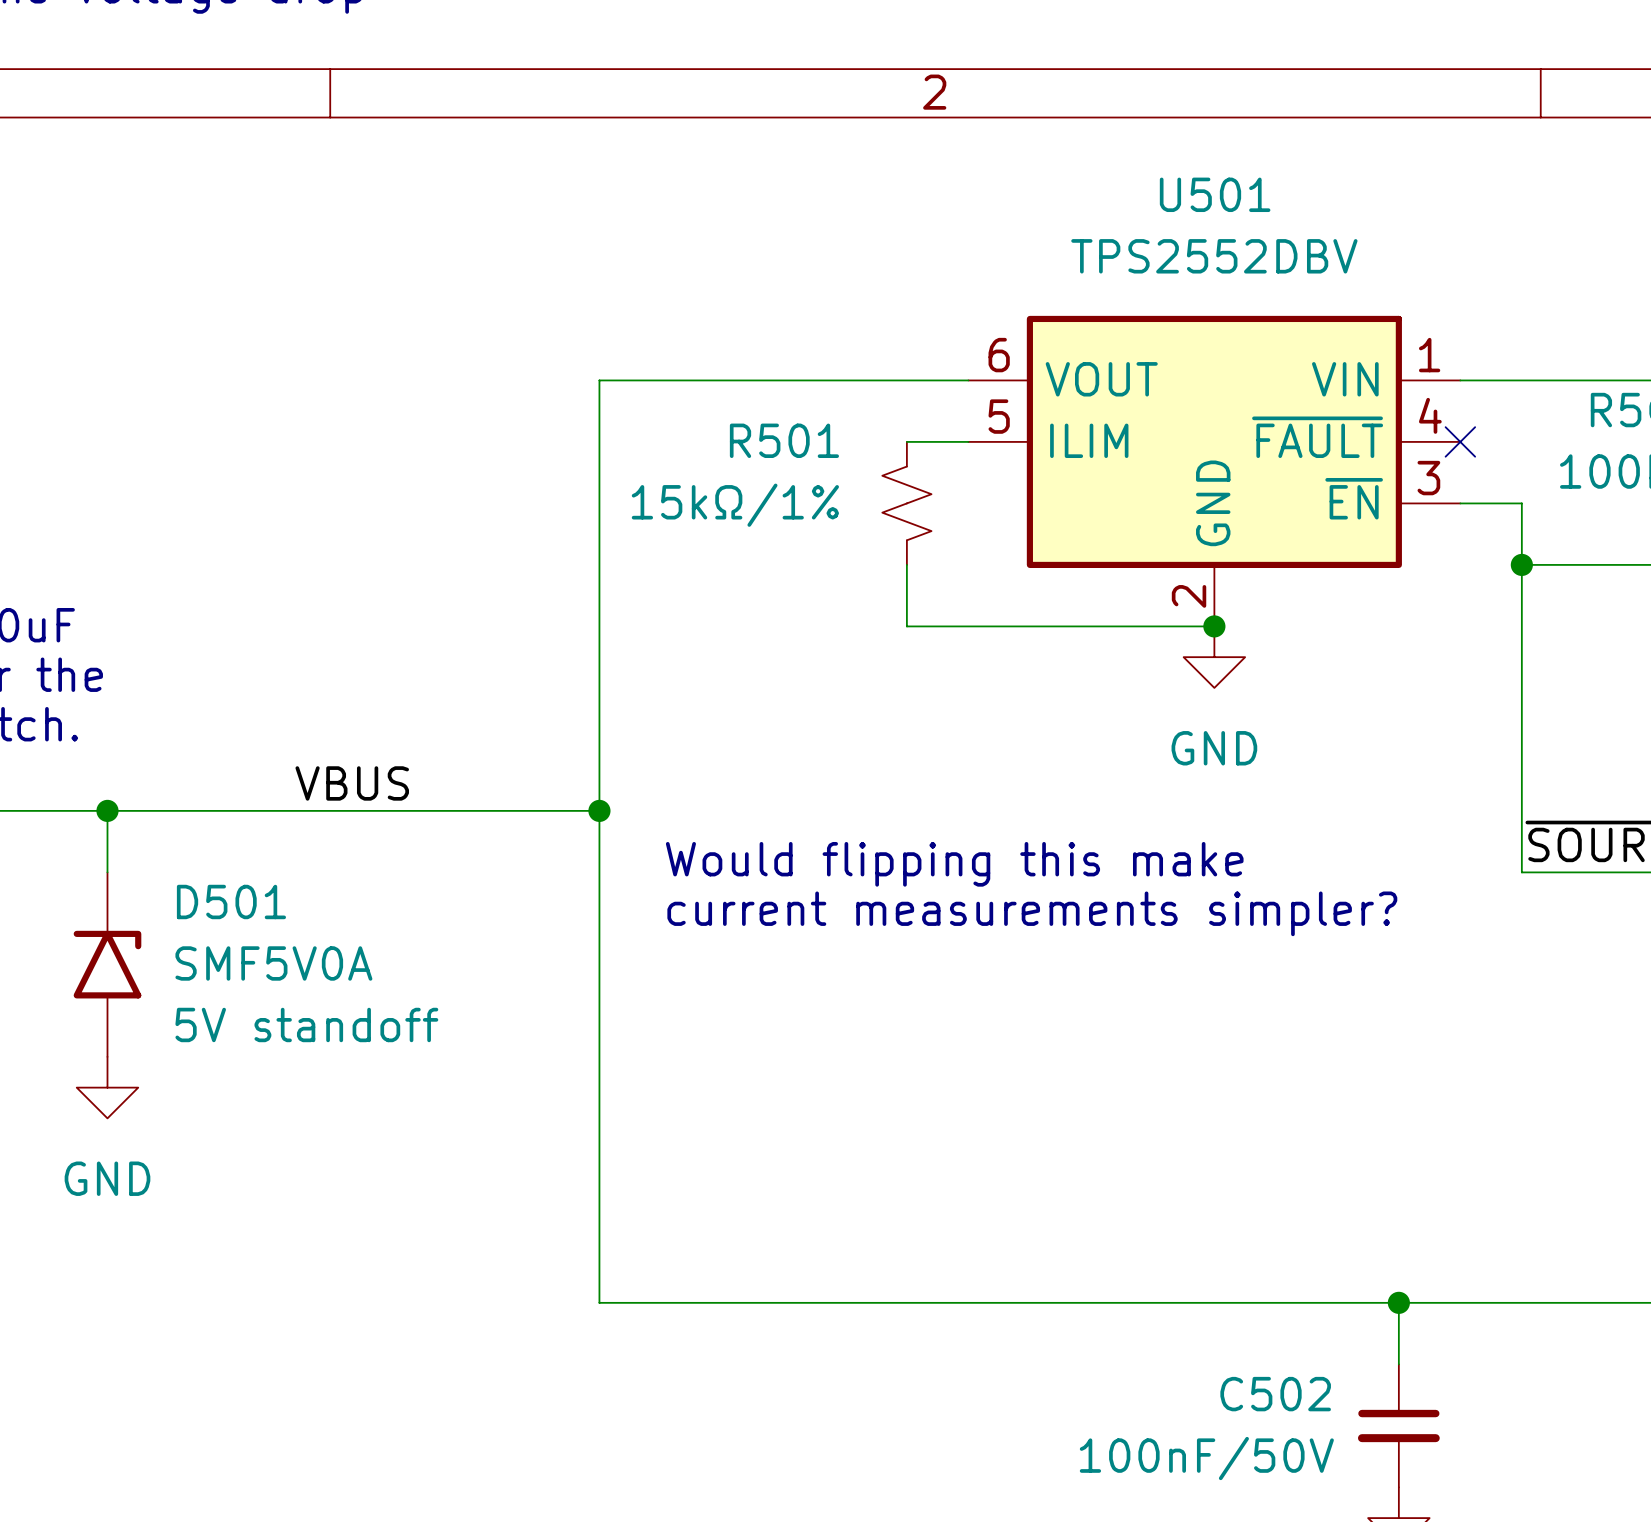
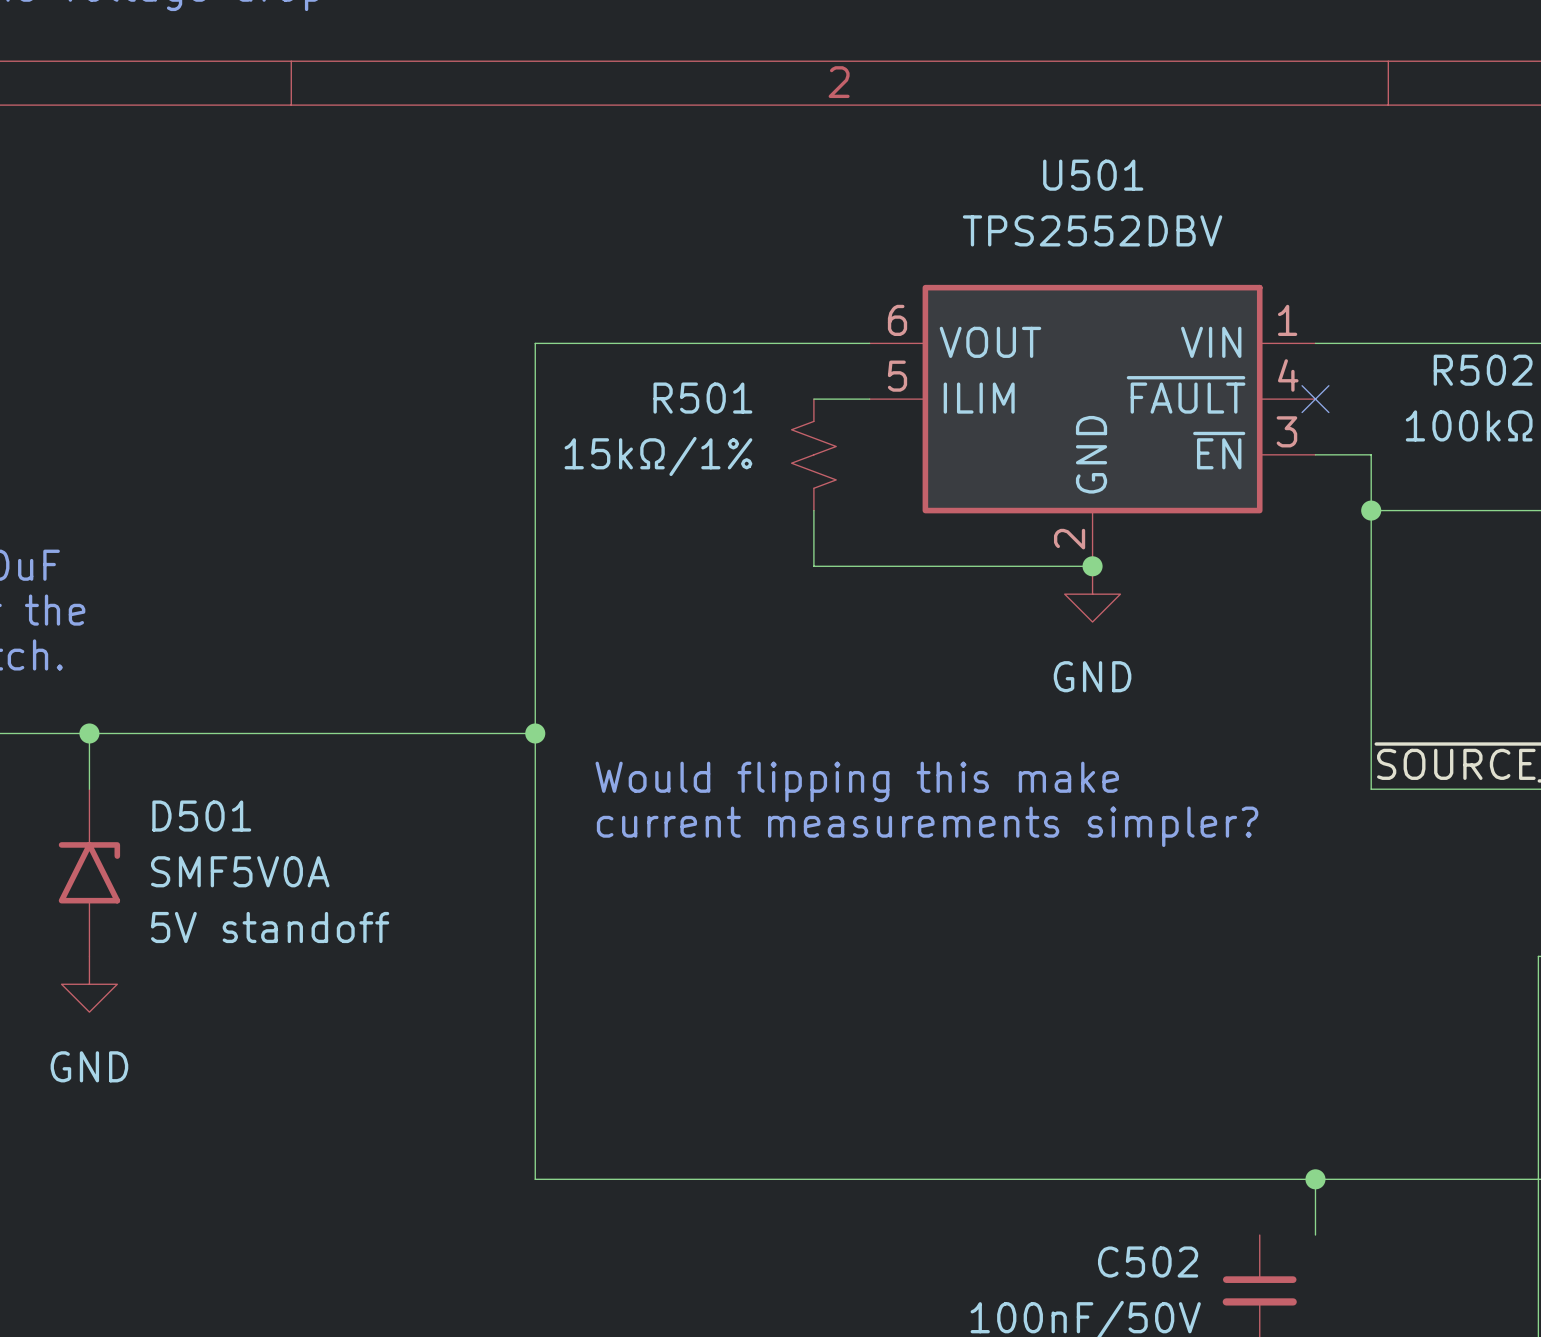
label: VBUS (352, 783) -> none
wire: (1398, 1302) (1398, 1364) -> (1315, 1179) (1315, 1235)
junction position: (1398, 1302) -> (1315, 1179)

